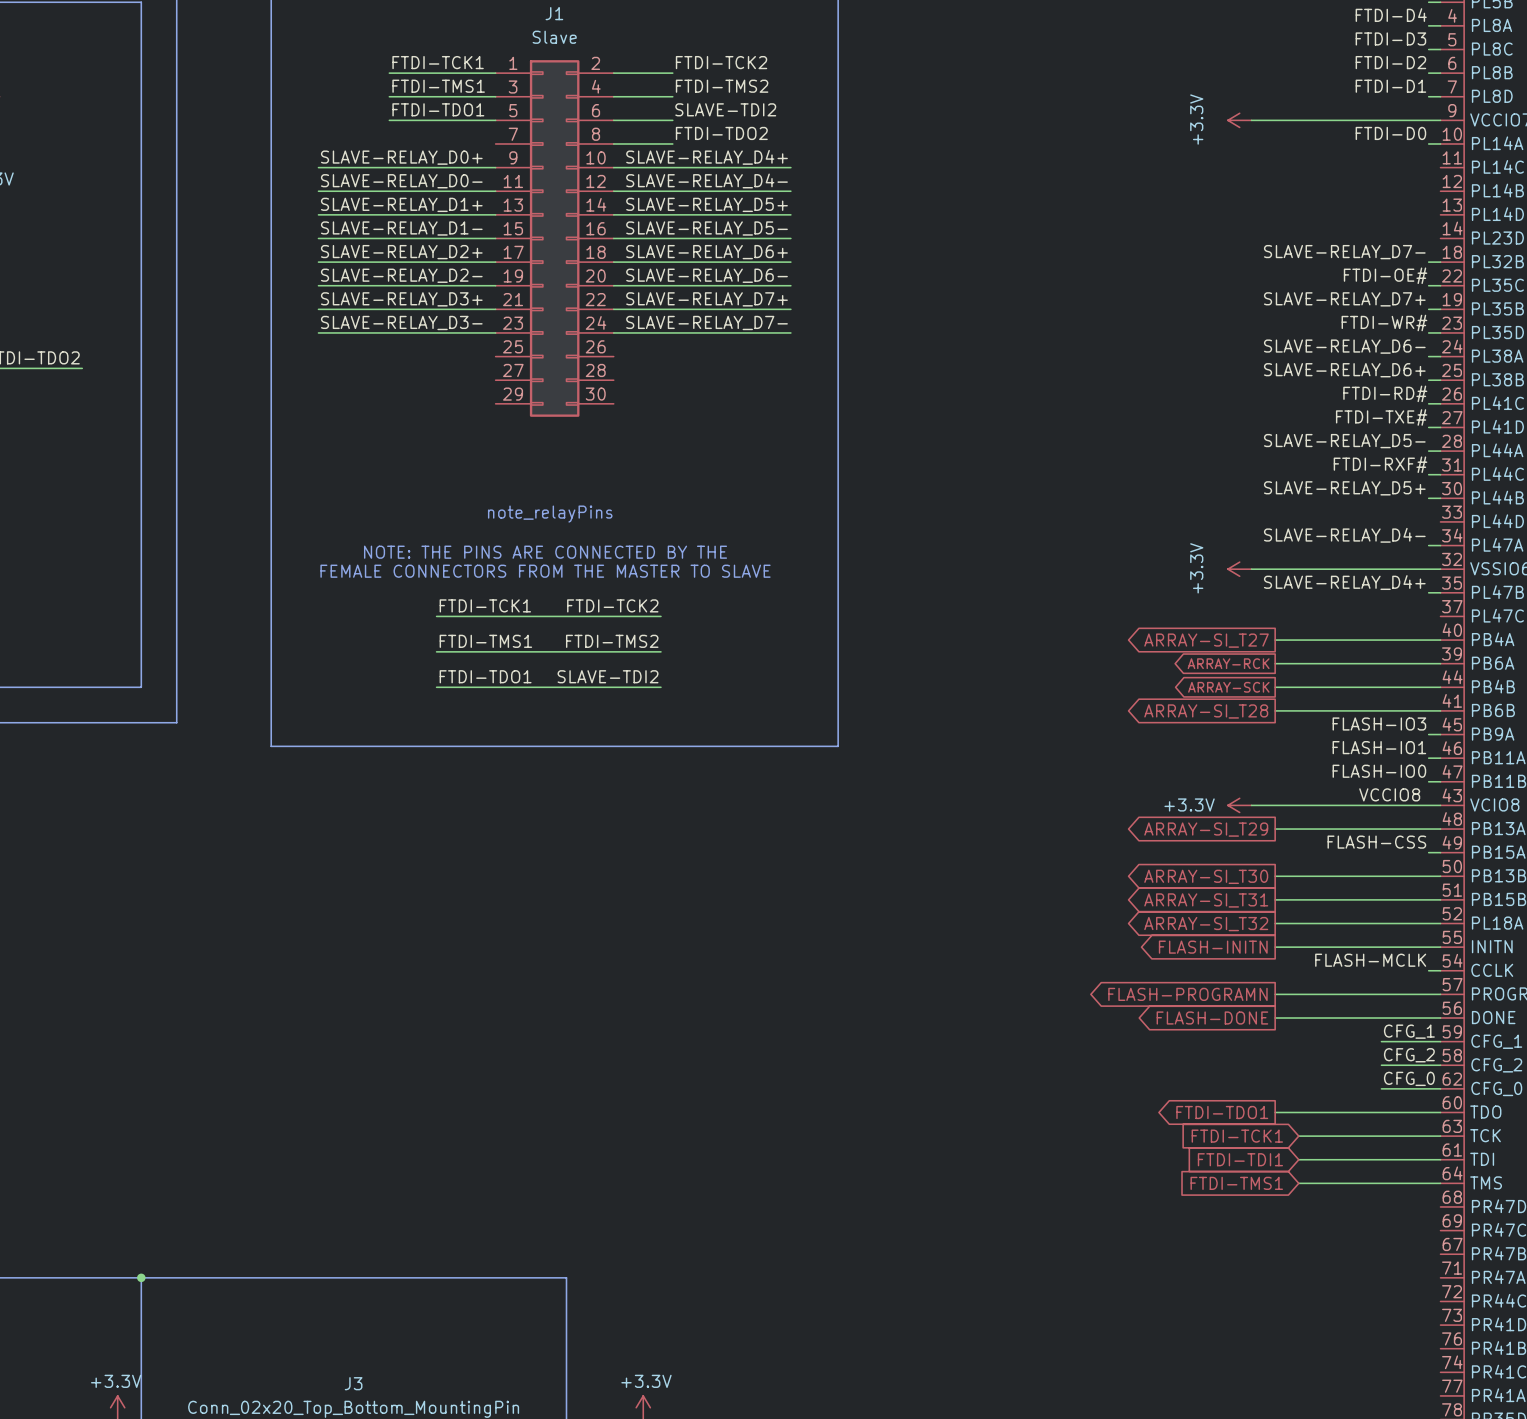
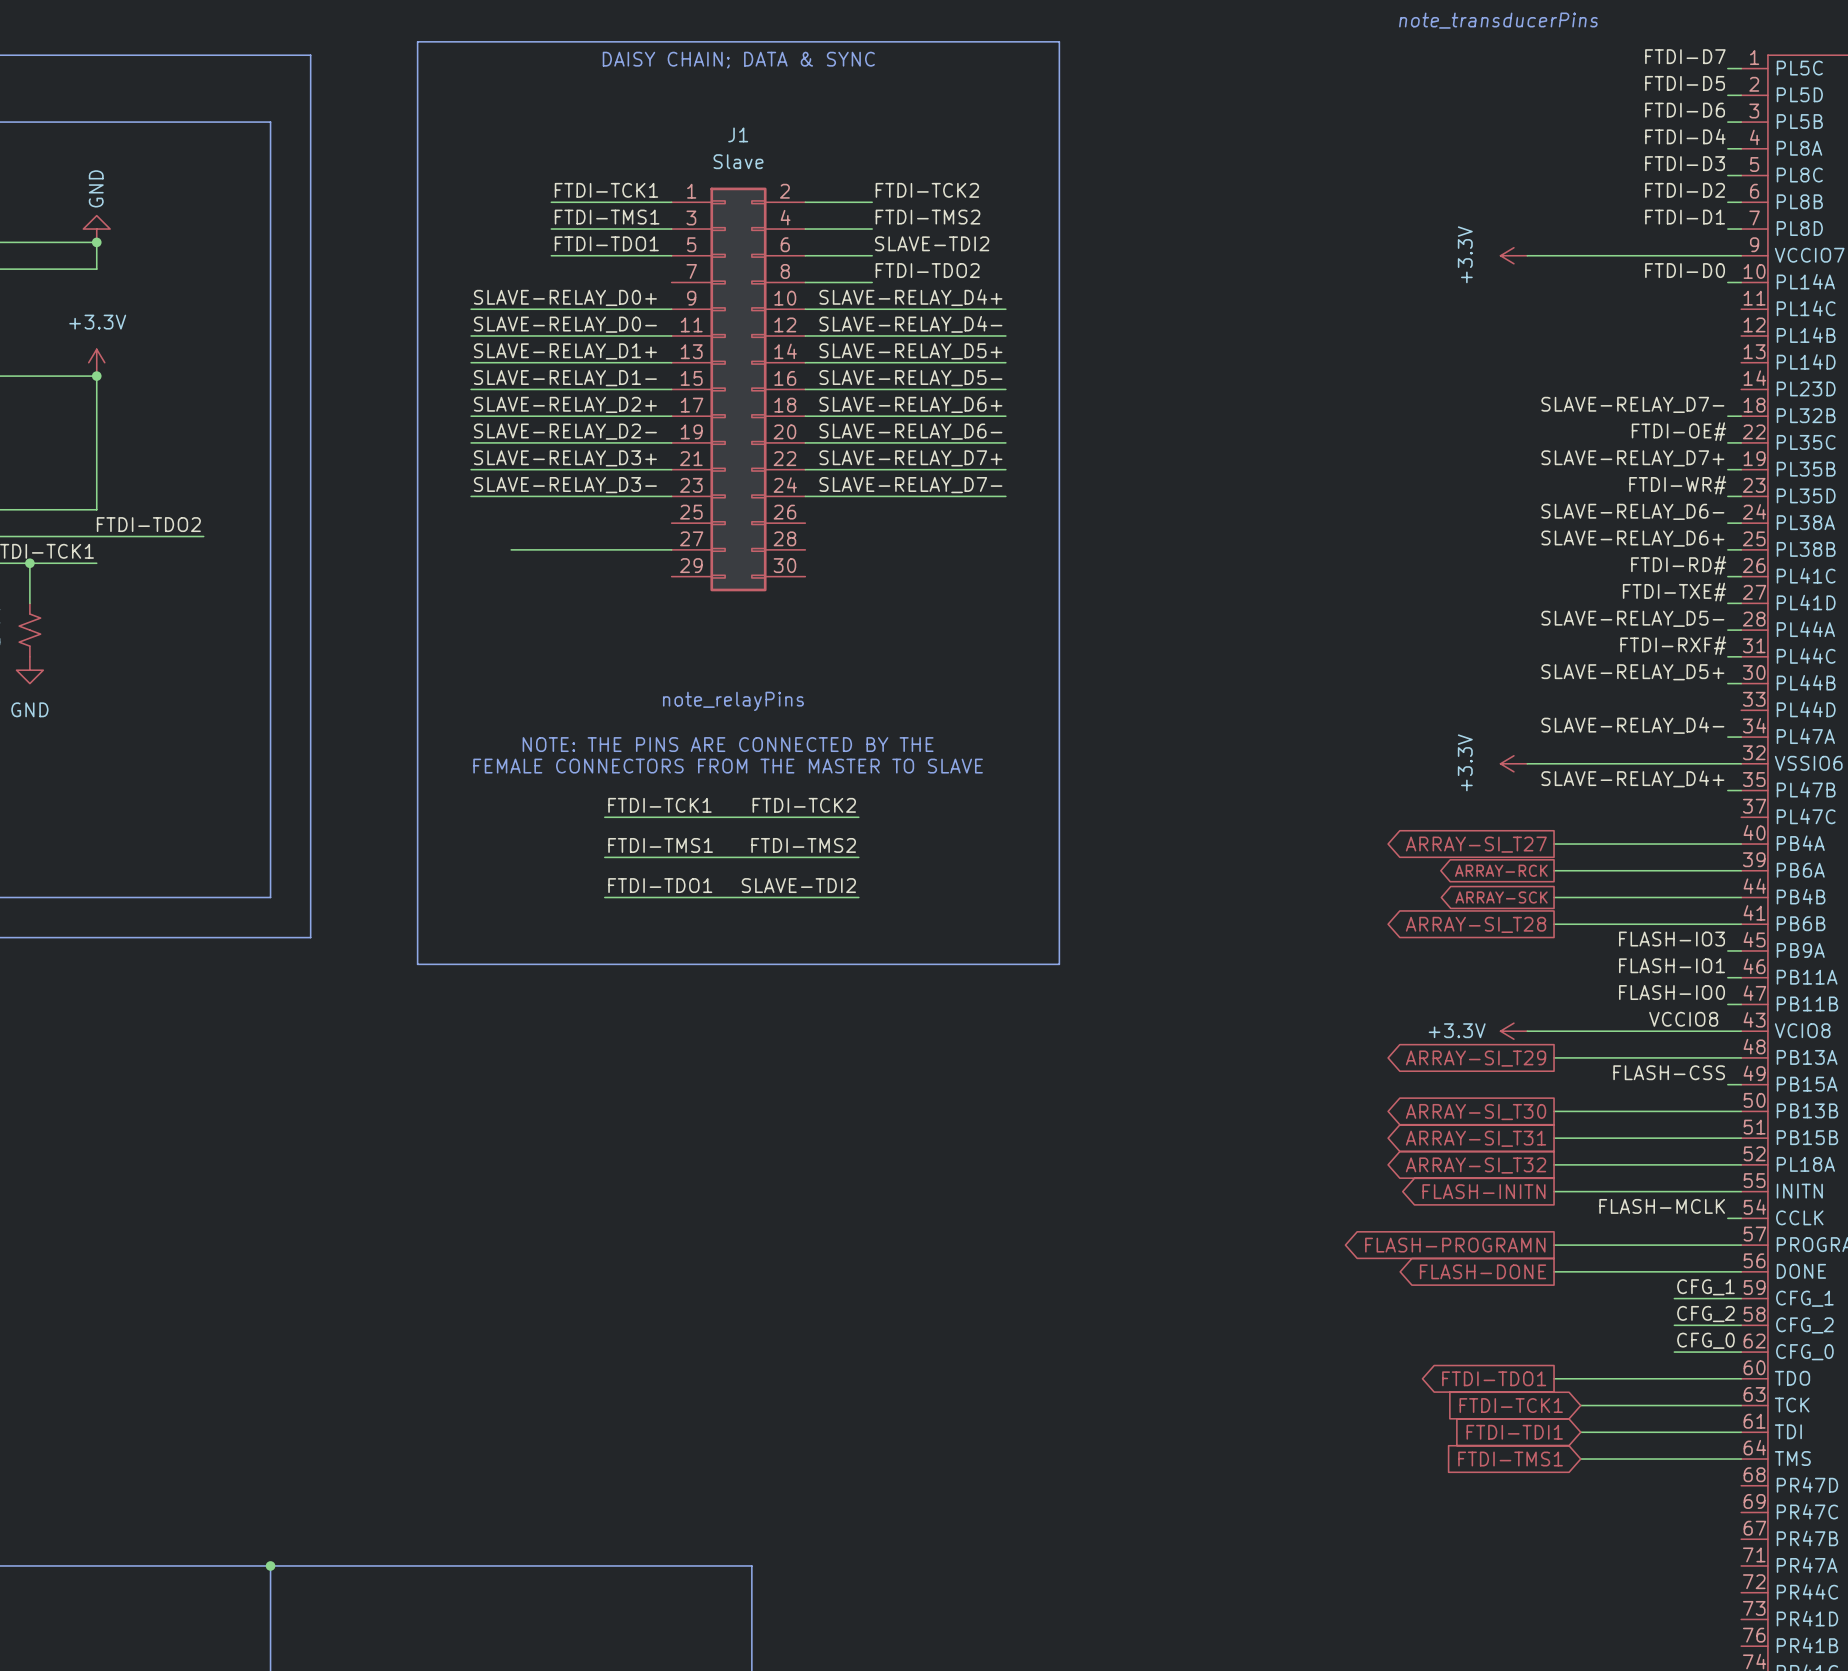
wire: none -> (511, 549) (671, 549)

